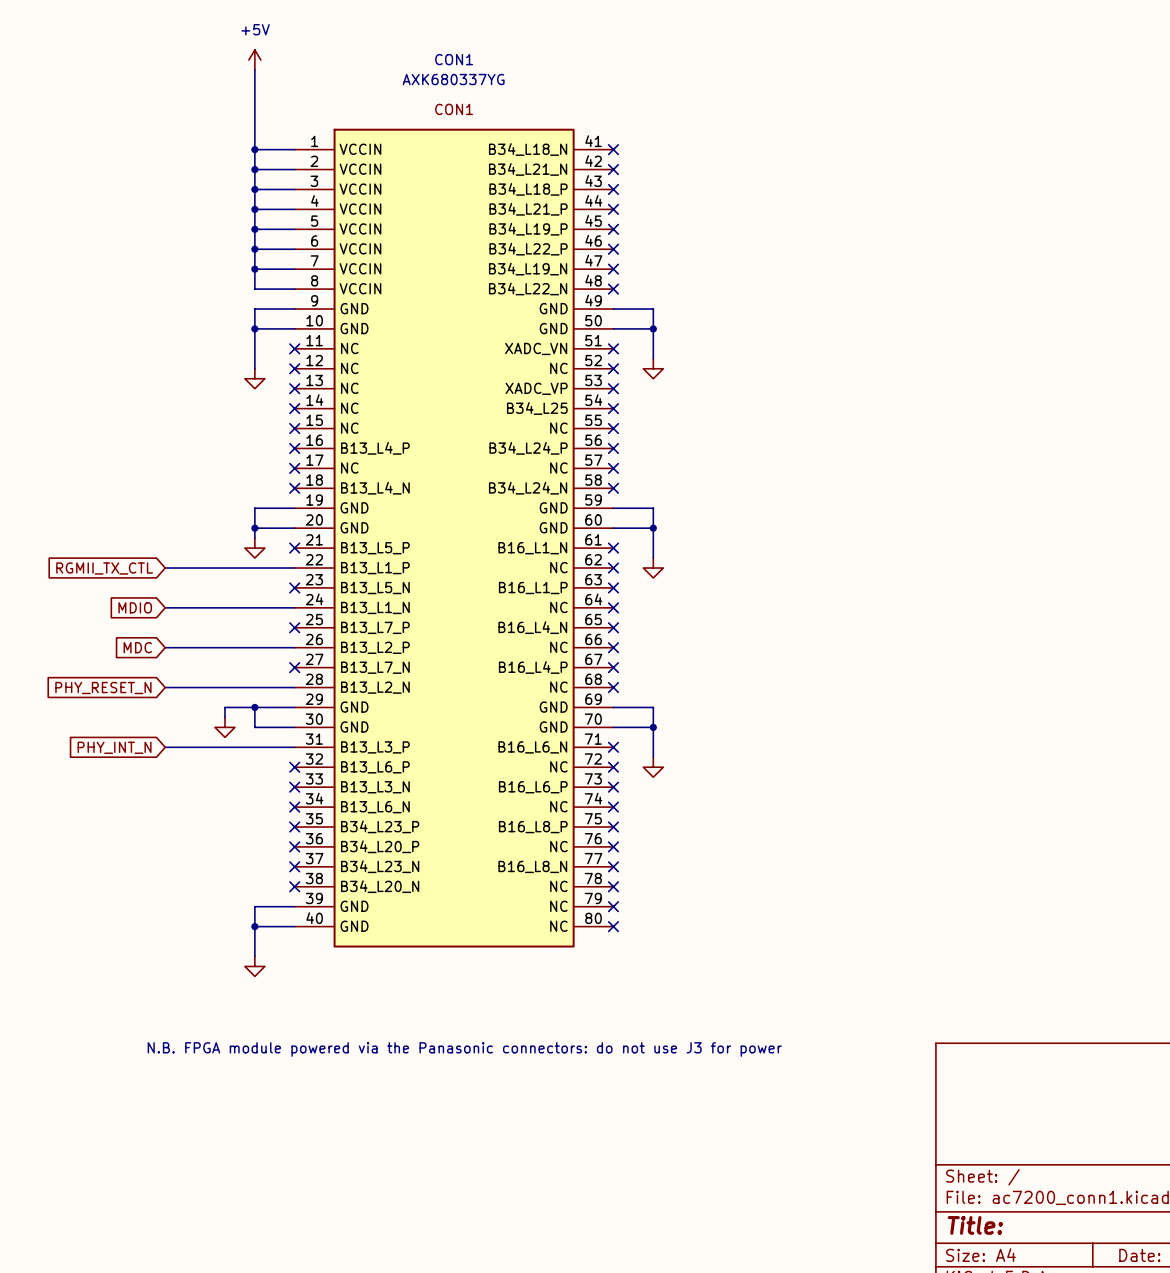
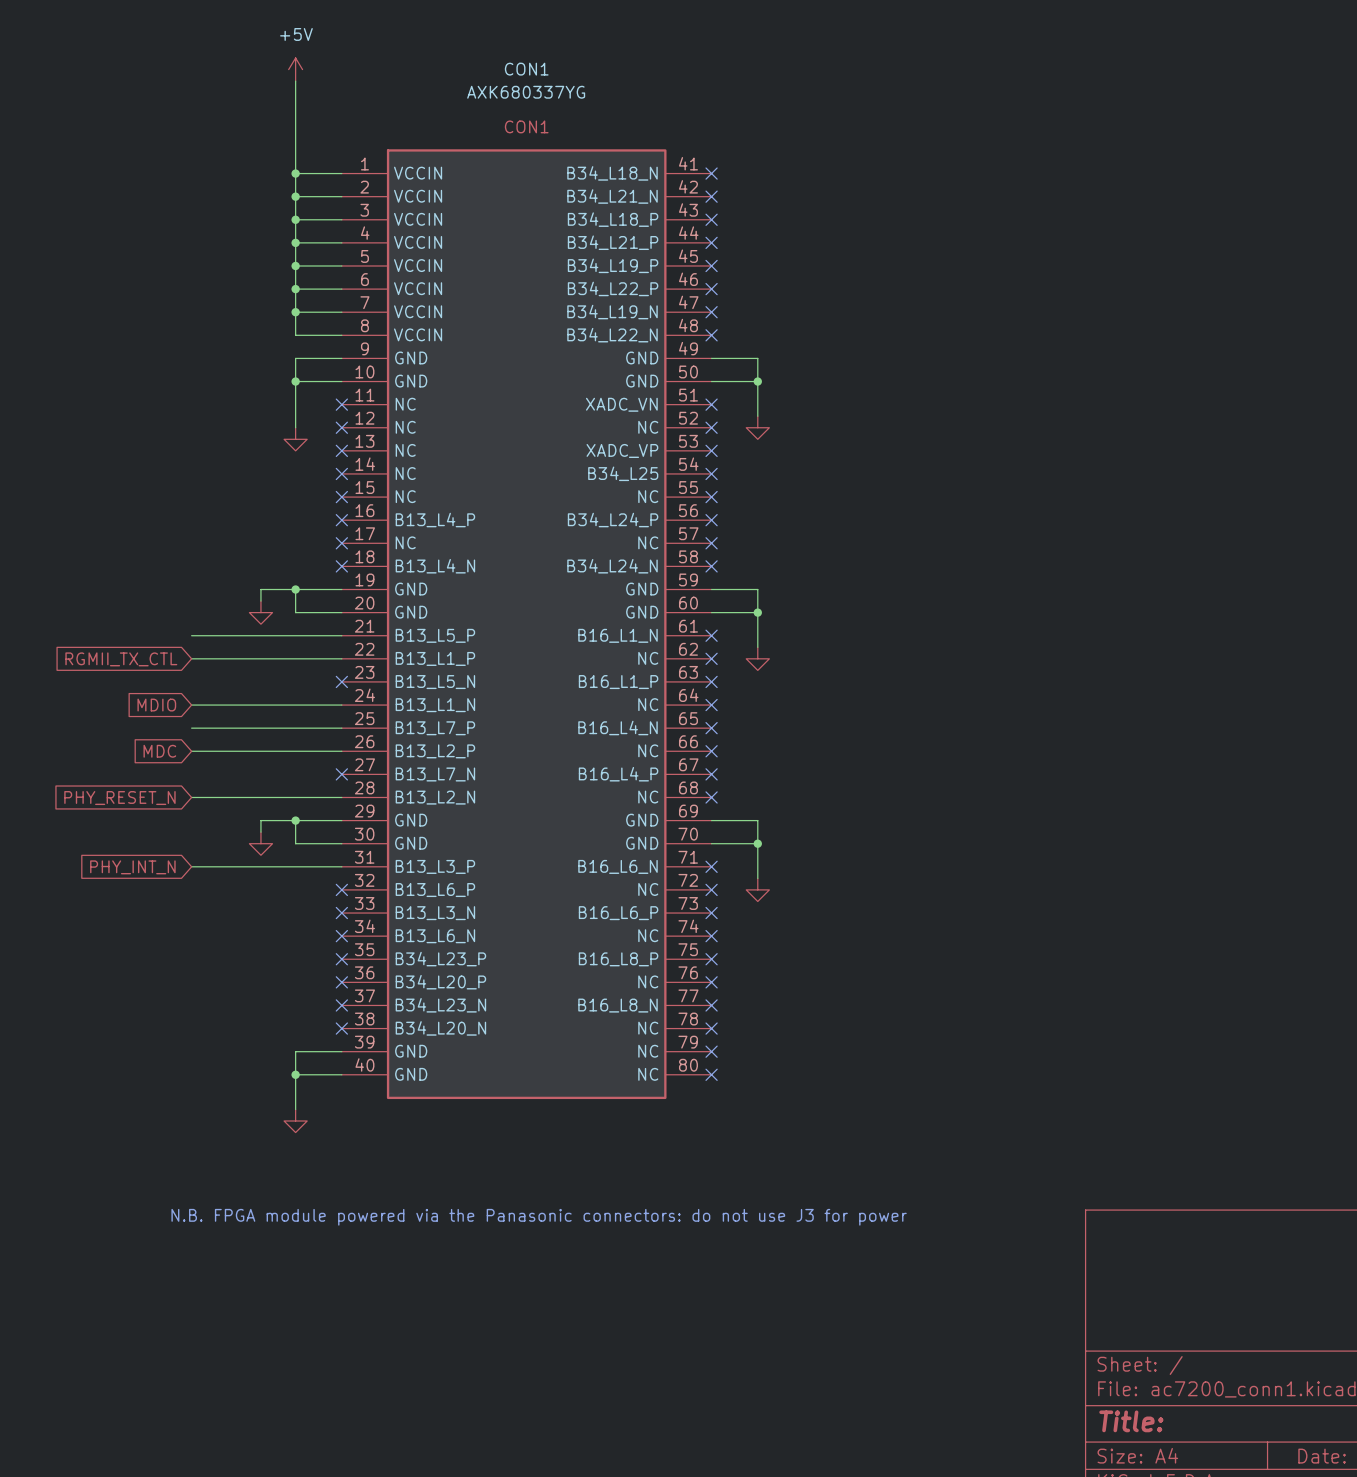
wire: none -> (295, 589) (260, 589) (260, 601)
wire: (254, 528) (254, 538) -> none
junction position: (254, 528) -> (295, 589)
wire: none -> (191, 635) (341, 635)
power symbol position: (254, 548) -> (260, 612)
no-connect mark: (294, 548) -> none
wire: none -> (191, 728) (341, 728)
no-connect mark: (294, 627) -> none

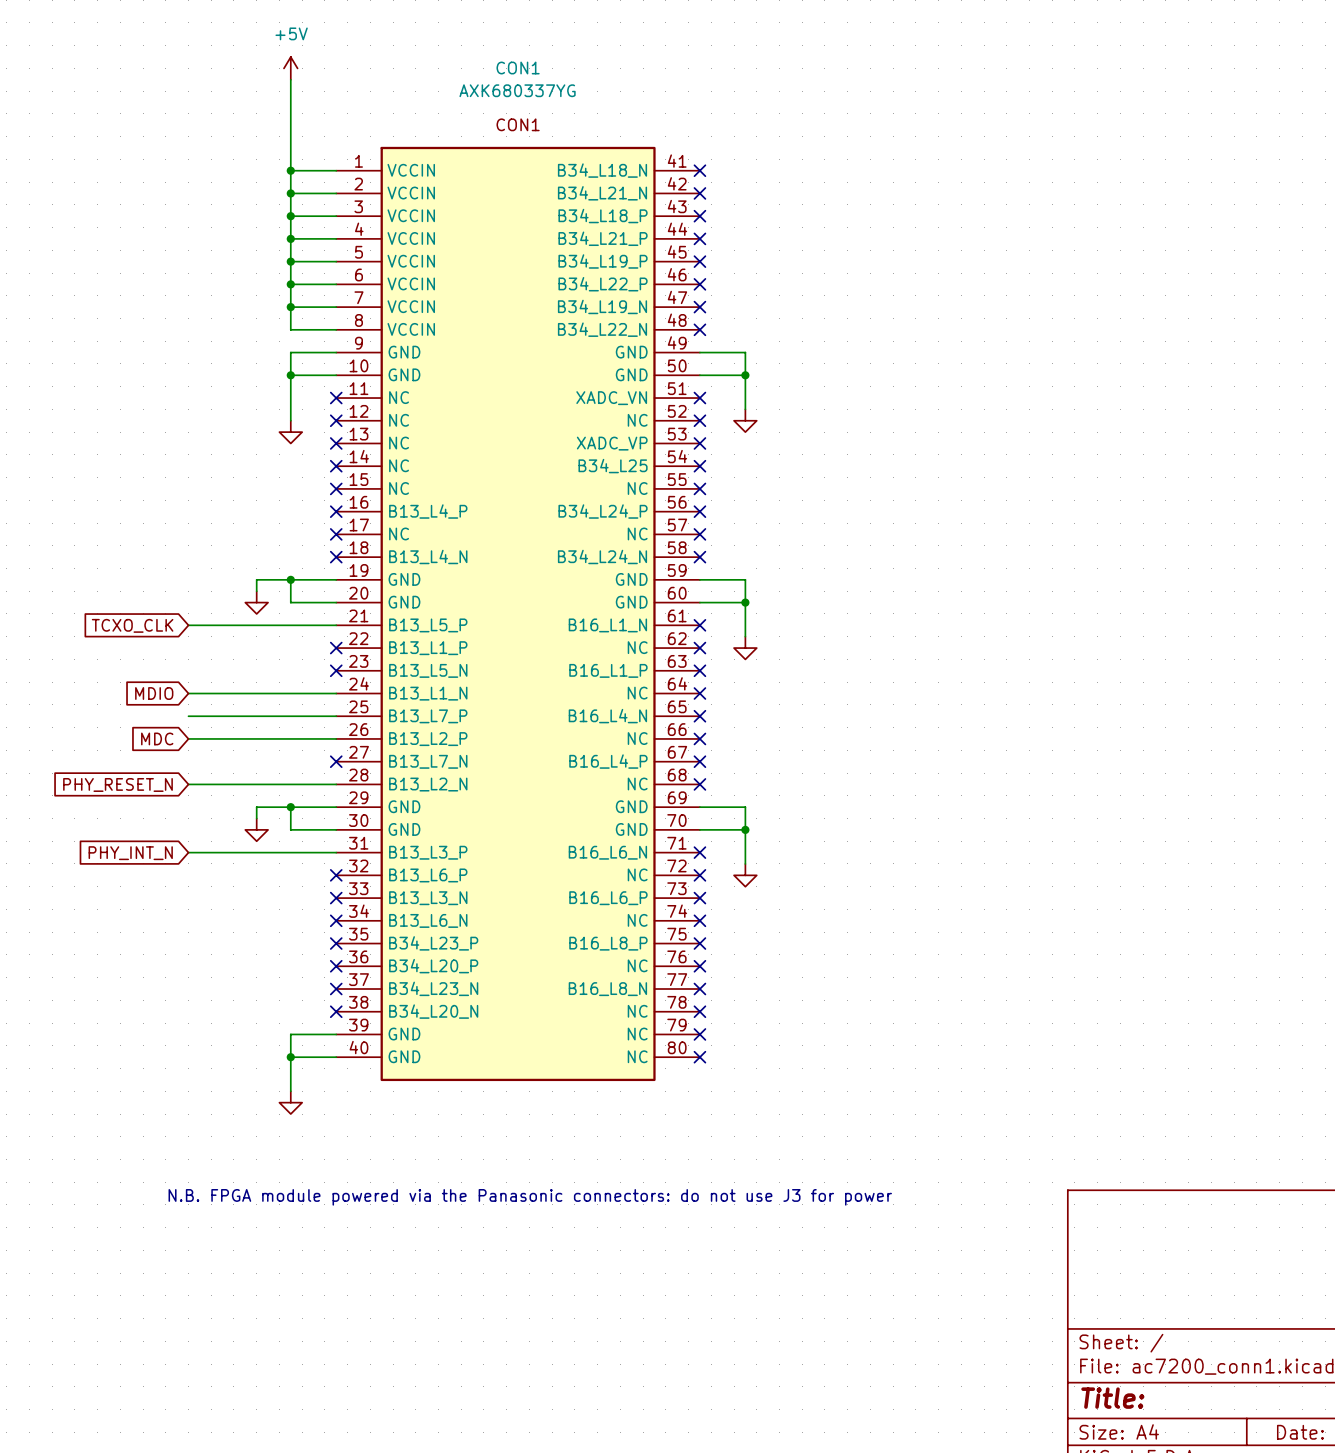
global label: none -> TCXO_CLK (132, 625)
wire: (191, 658) (341, 658) -> none
no-connect mark: none -> (336, 648)
global label: RGMII_TX_CTL (121, 659) -> none

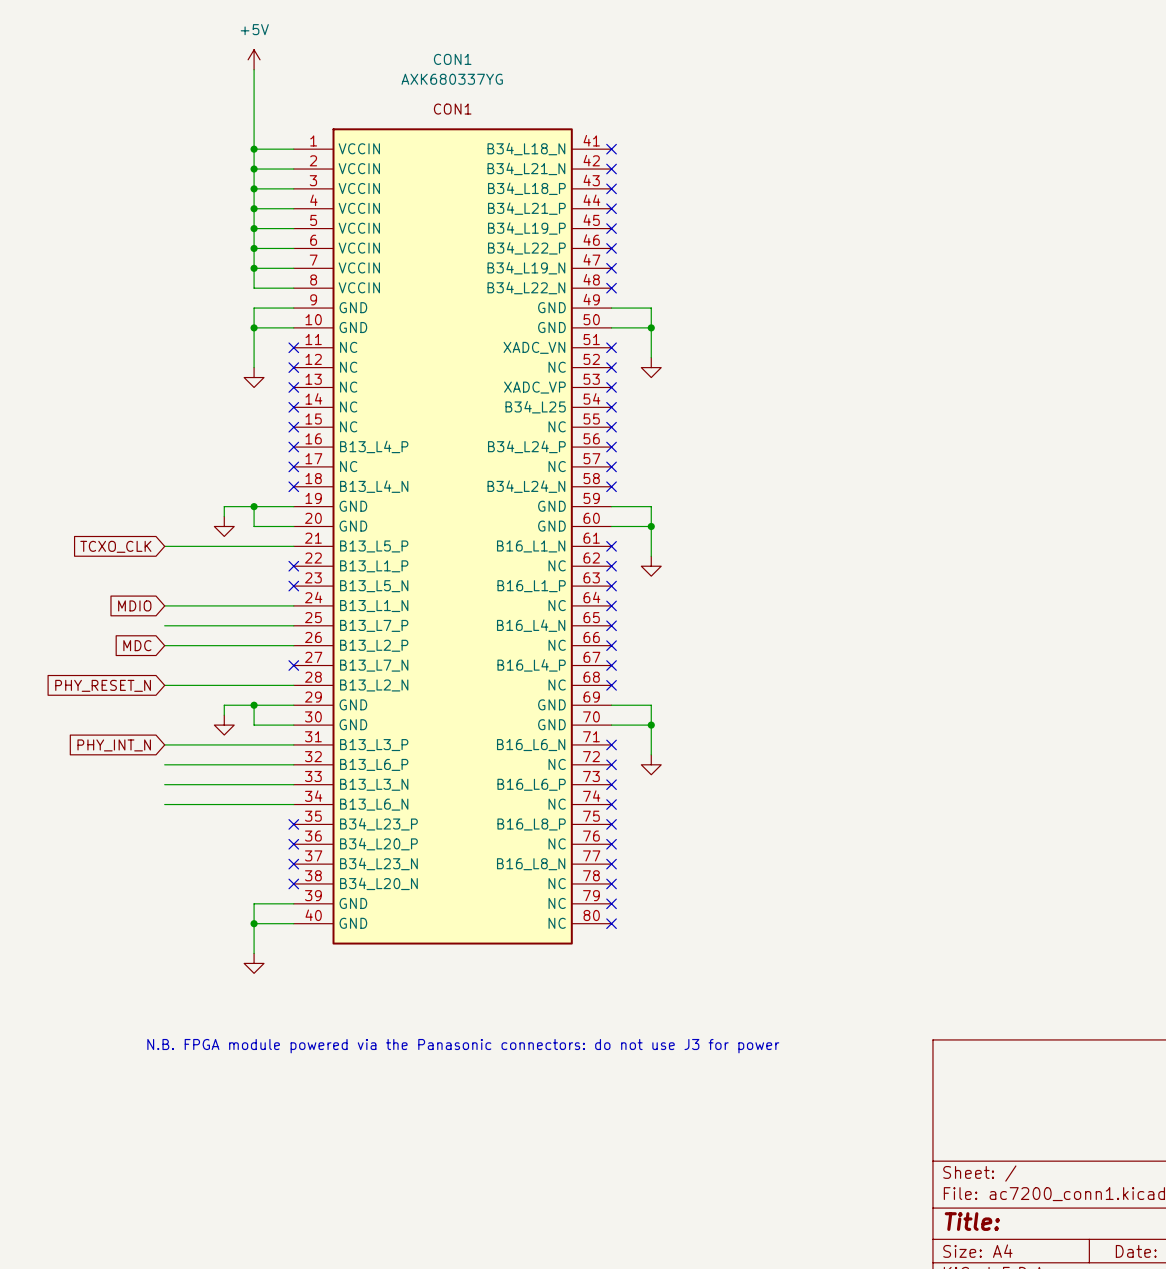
wire: none -> (164, 764) (293, 764)
no-connect mark: (336, 875) -> none
wire: none -> (164, 784) (293, 784)
no-connect mark: (336, 898) -> none
wire: none -> (164, 804) (293, 804)
no-connect mark: (336, 920) -> none

